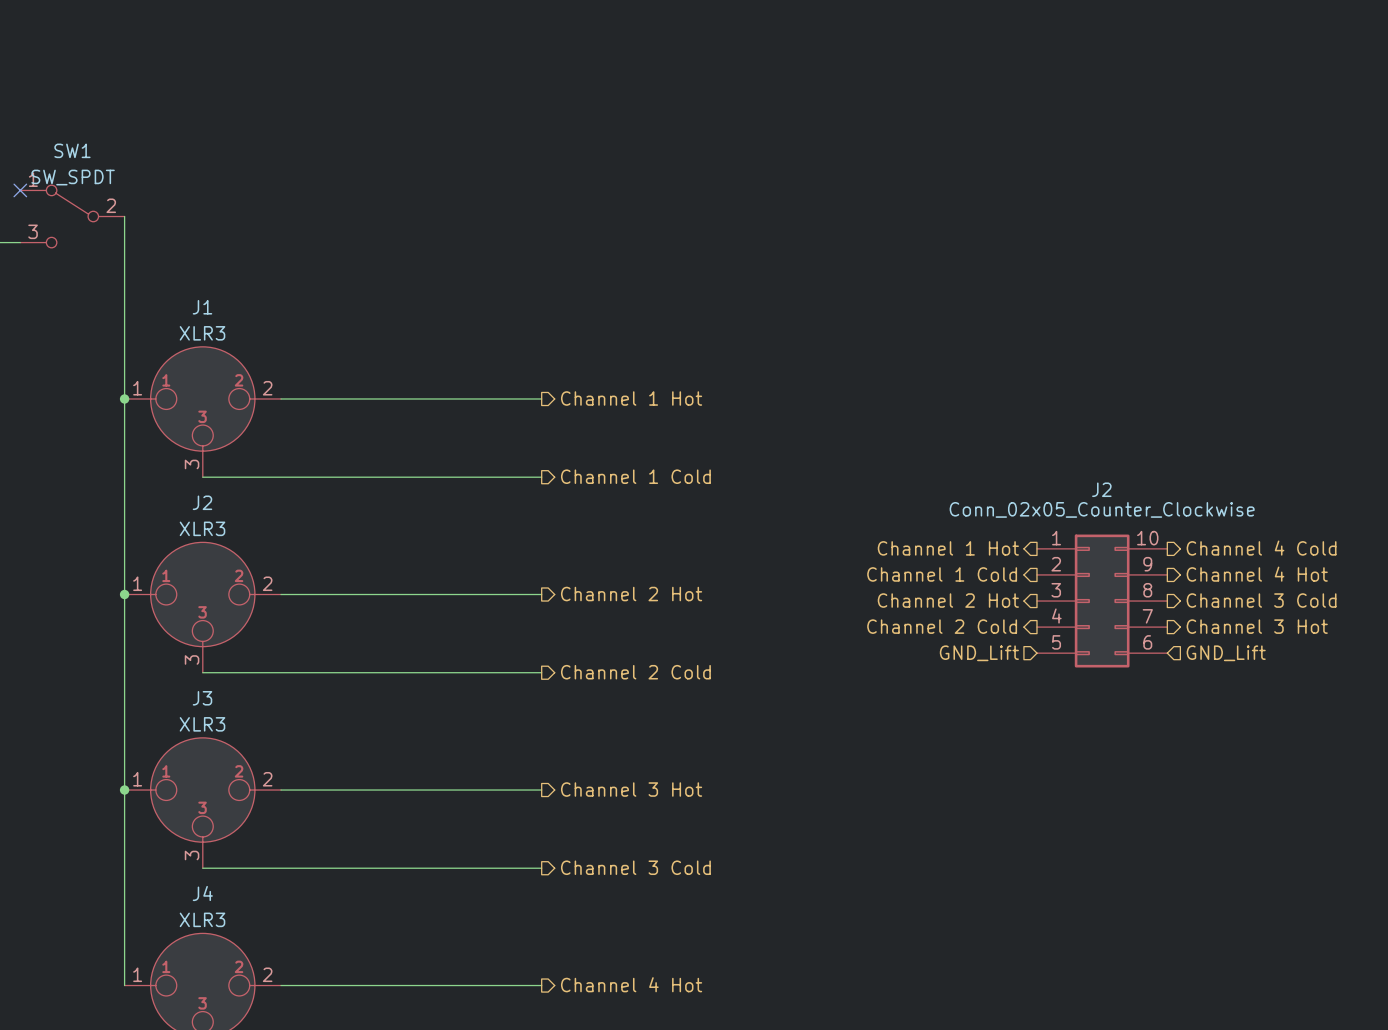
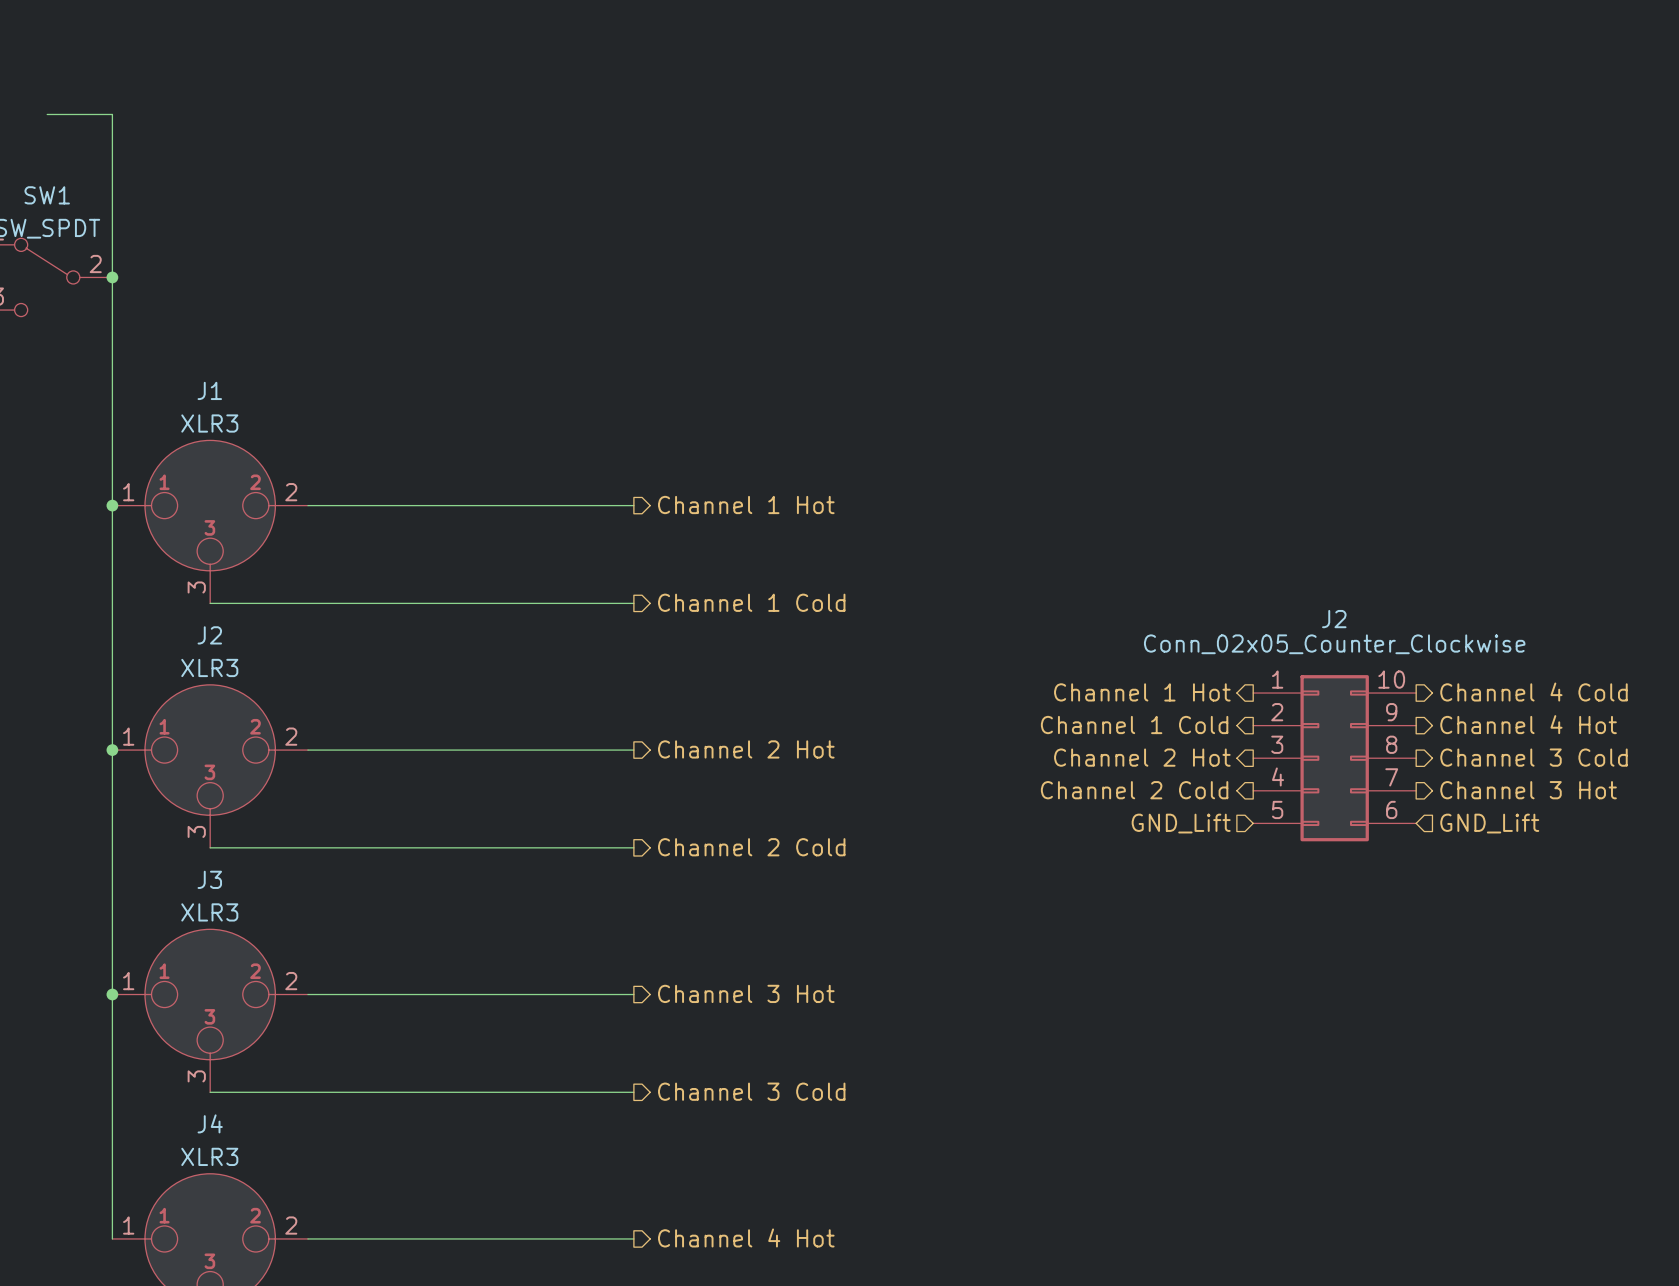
wire: none -> (47, 114) (112, 114) (112, 277)
junction: none -> (112, 277)

